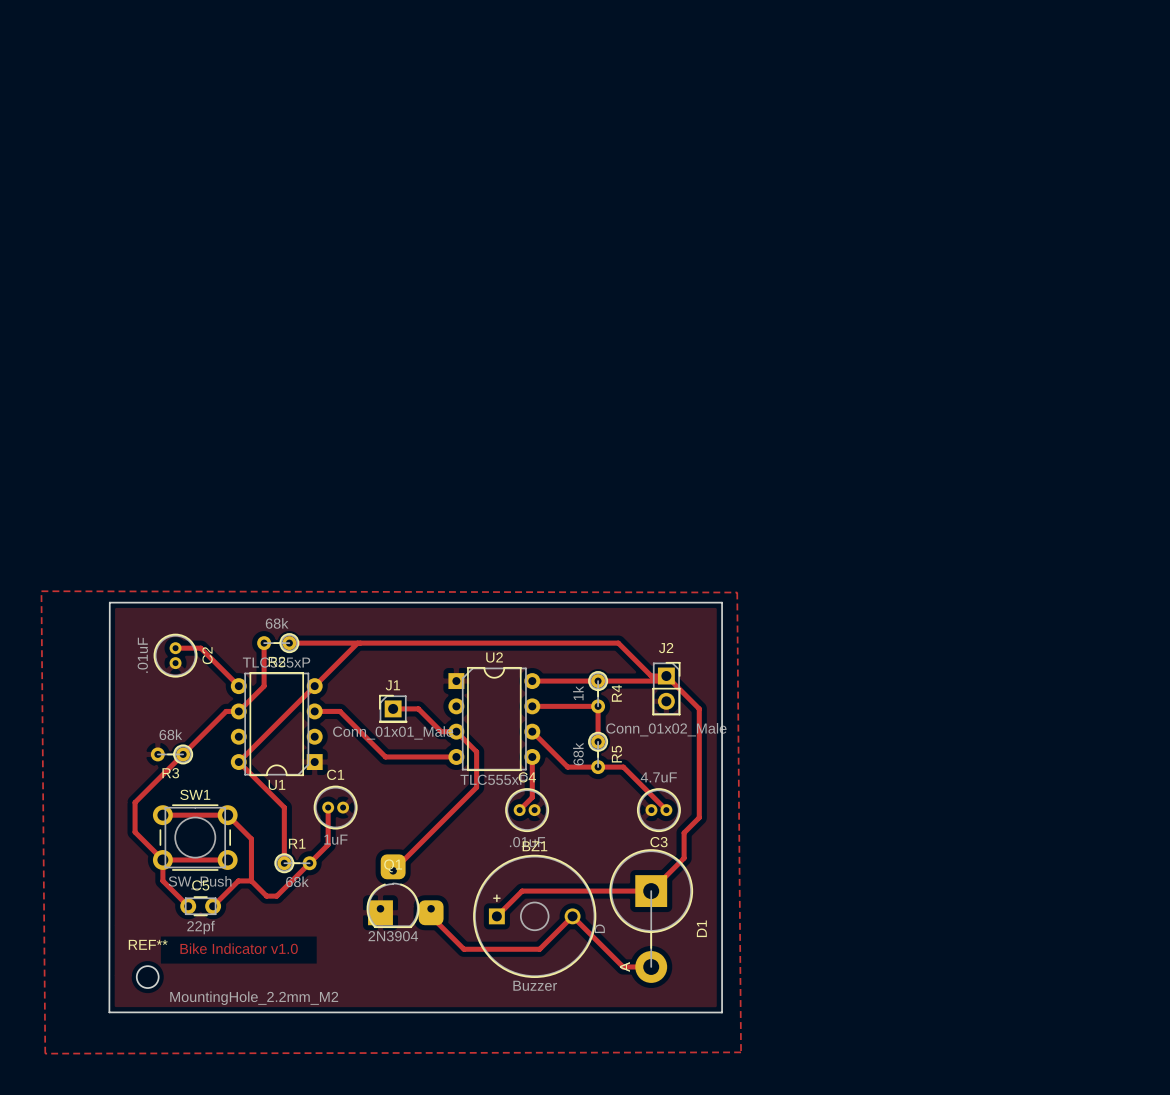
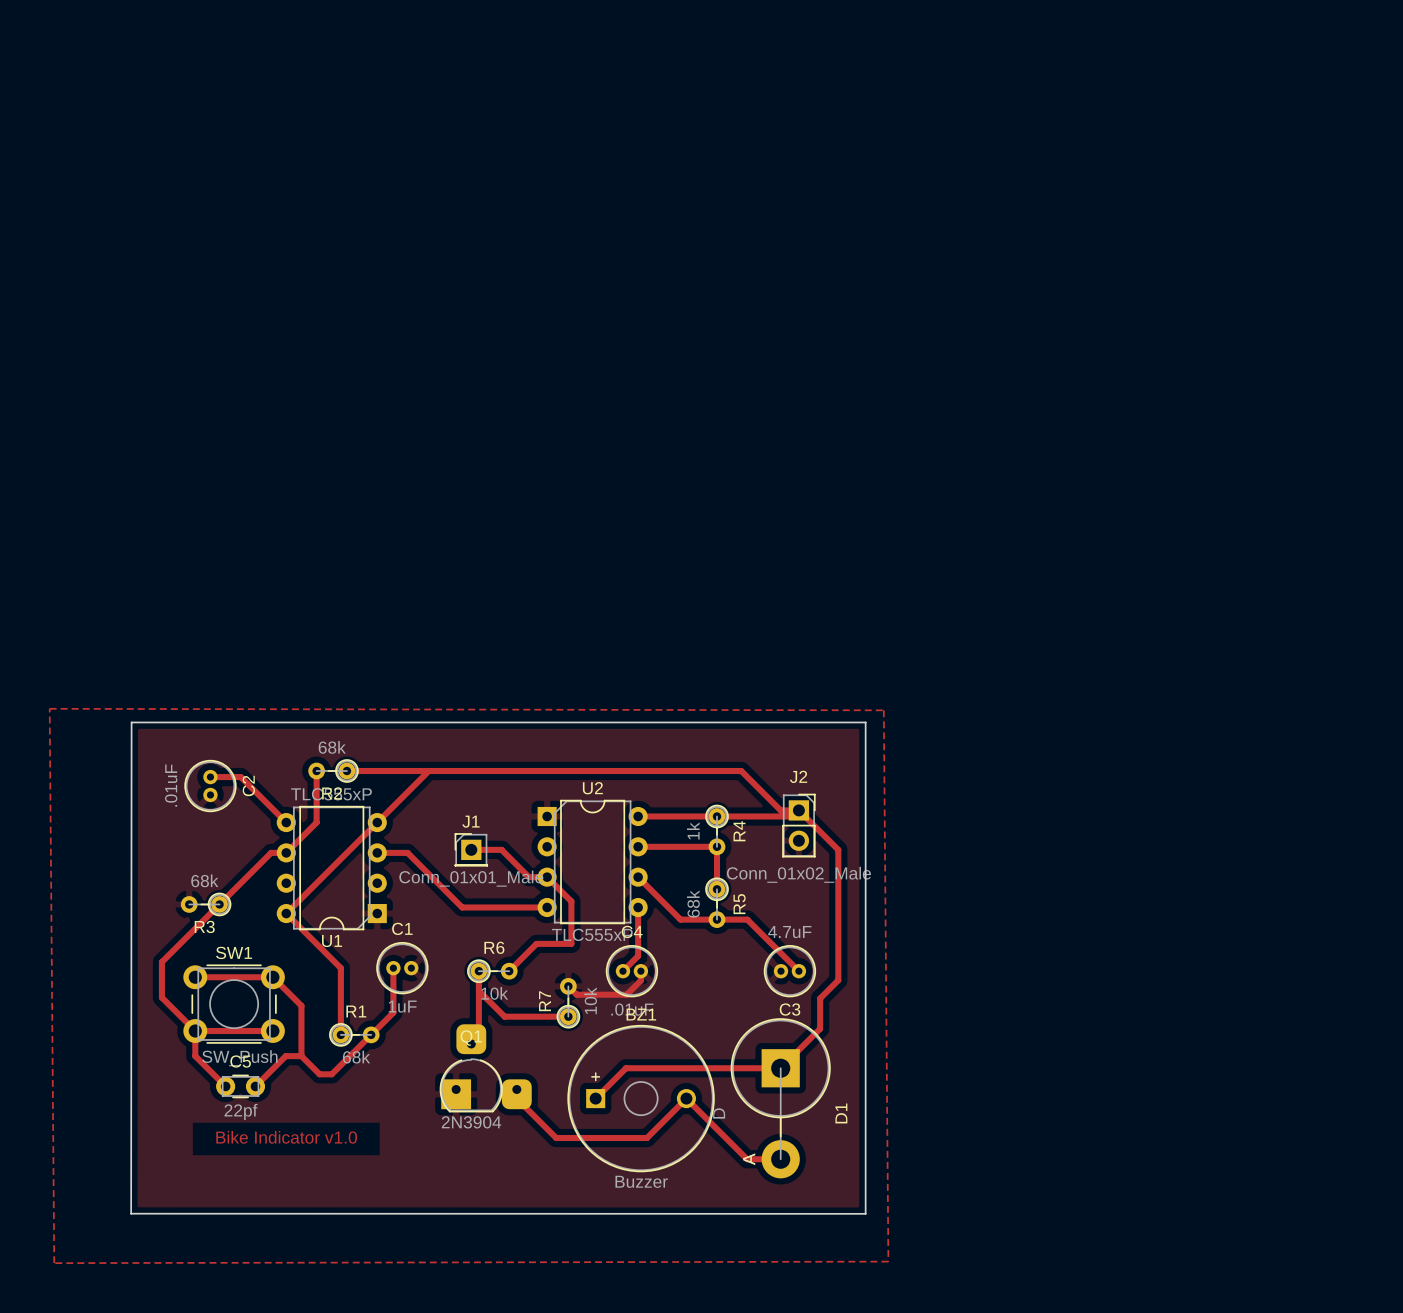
track: (476, 787) (399, 864) -> (571, 943) (536, 943) (509, 971)
track: none -> (478, 971) (478, 1036)
R6: none -> 10k (492, 971)
track: none -> (640, 971) (640, 980) (626, 994) (576, 994) (568, 986)
track: none -> (478, 990) (504, 1016) (568, 1016)
R7: none -> 10k (568, 1003)
REF**: MountingHole_2.2mm_M2 (147, 977) -> none

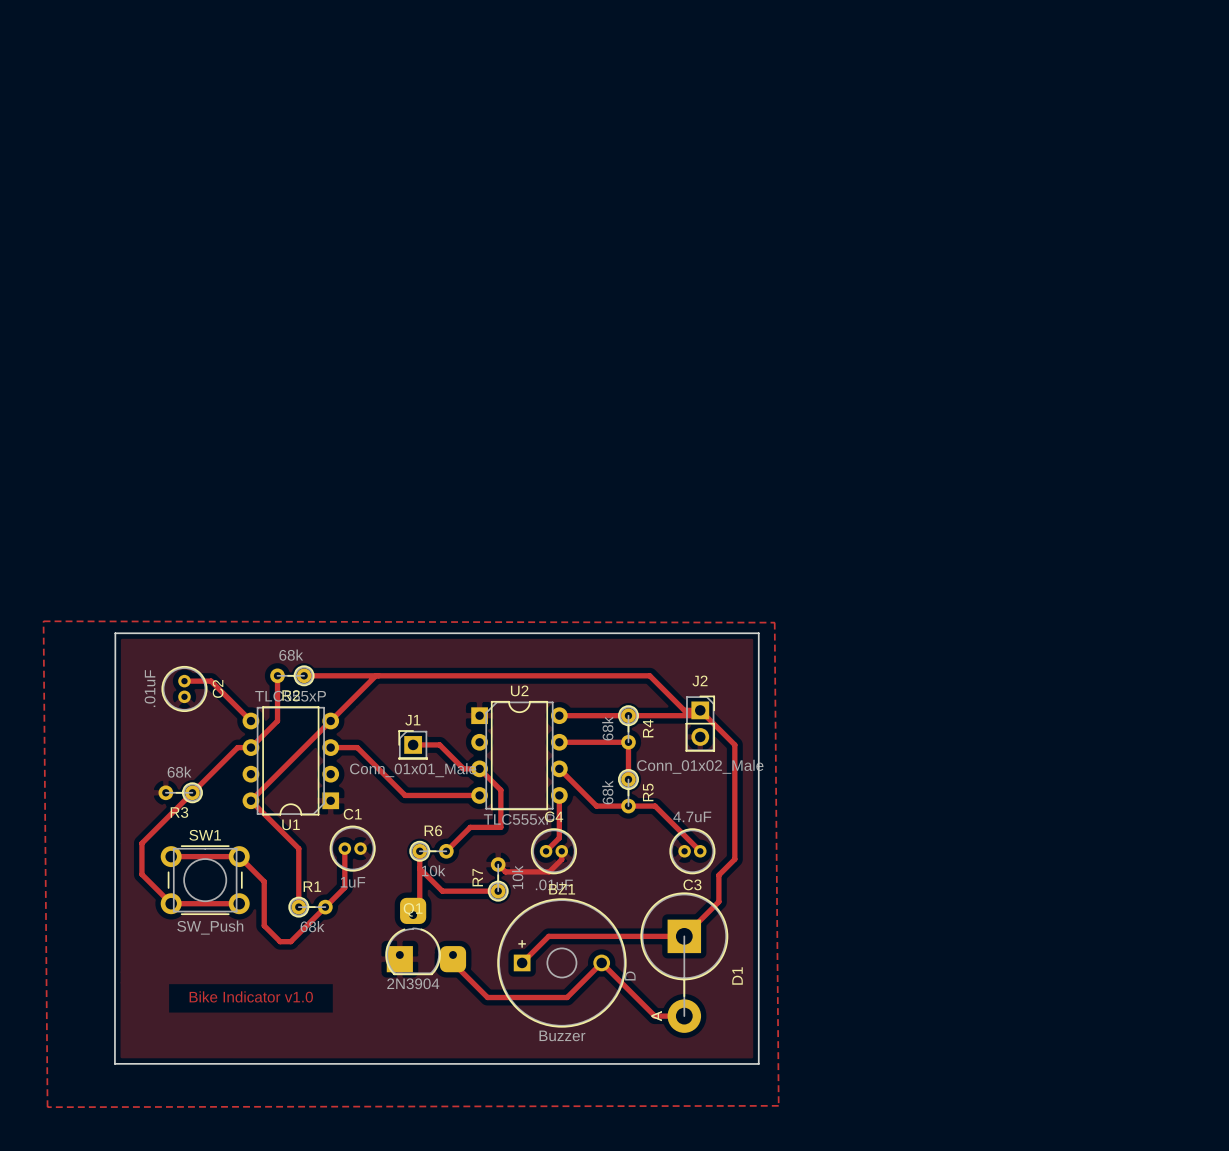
R4 value: 1k (693, 830) -> 68k (607, 728)
track: (195, 1030) (195, 1056) (225, 1086) -> none
track: (301, 1056) (285, 1056) (255, 1086) -> none
C5: 22pf (240, 1086) -> none

